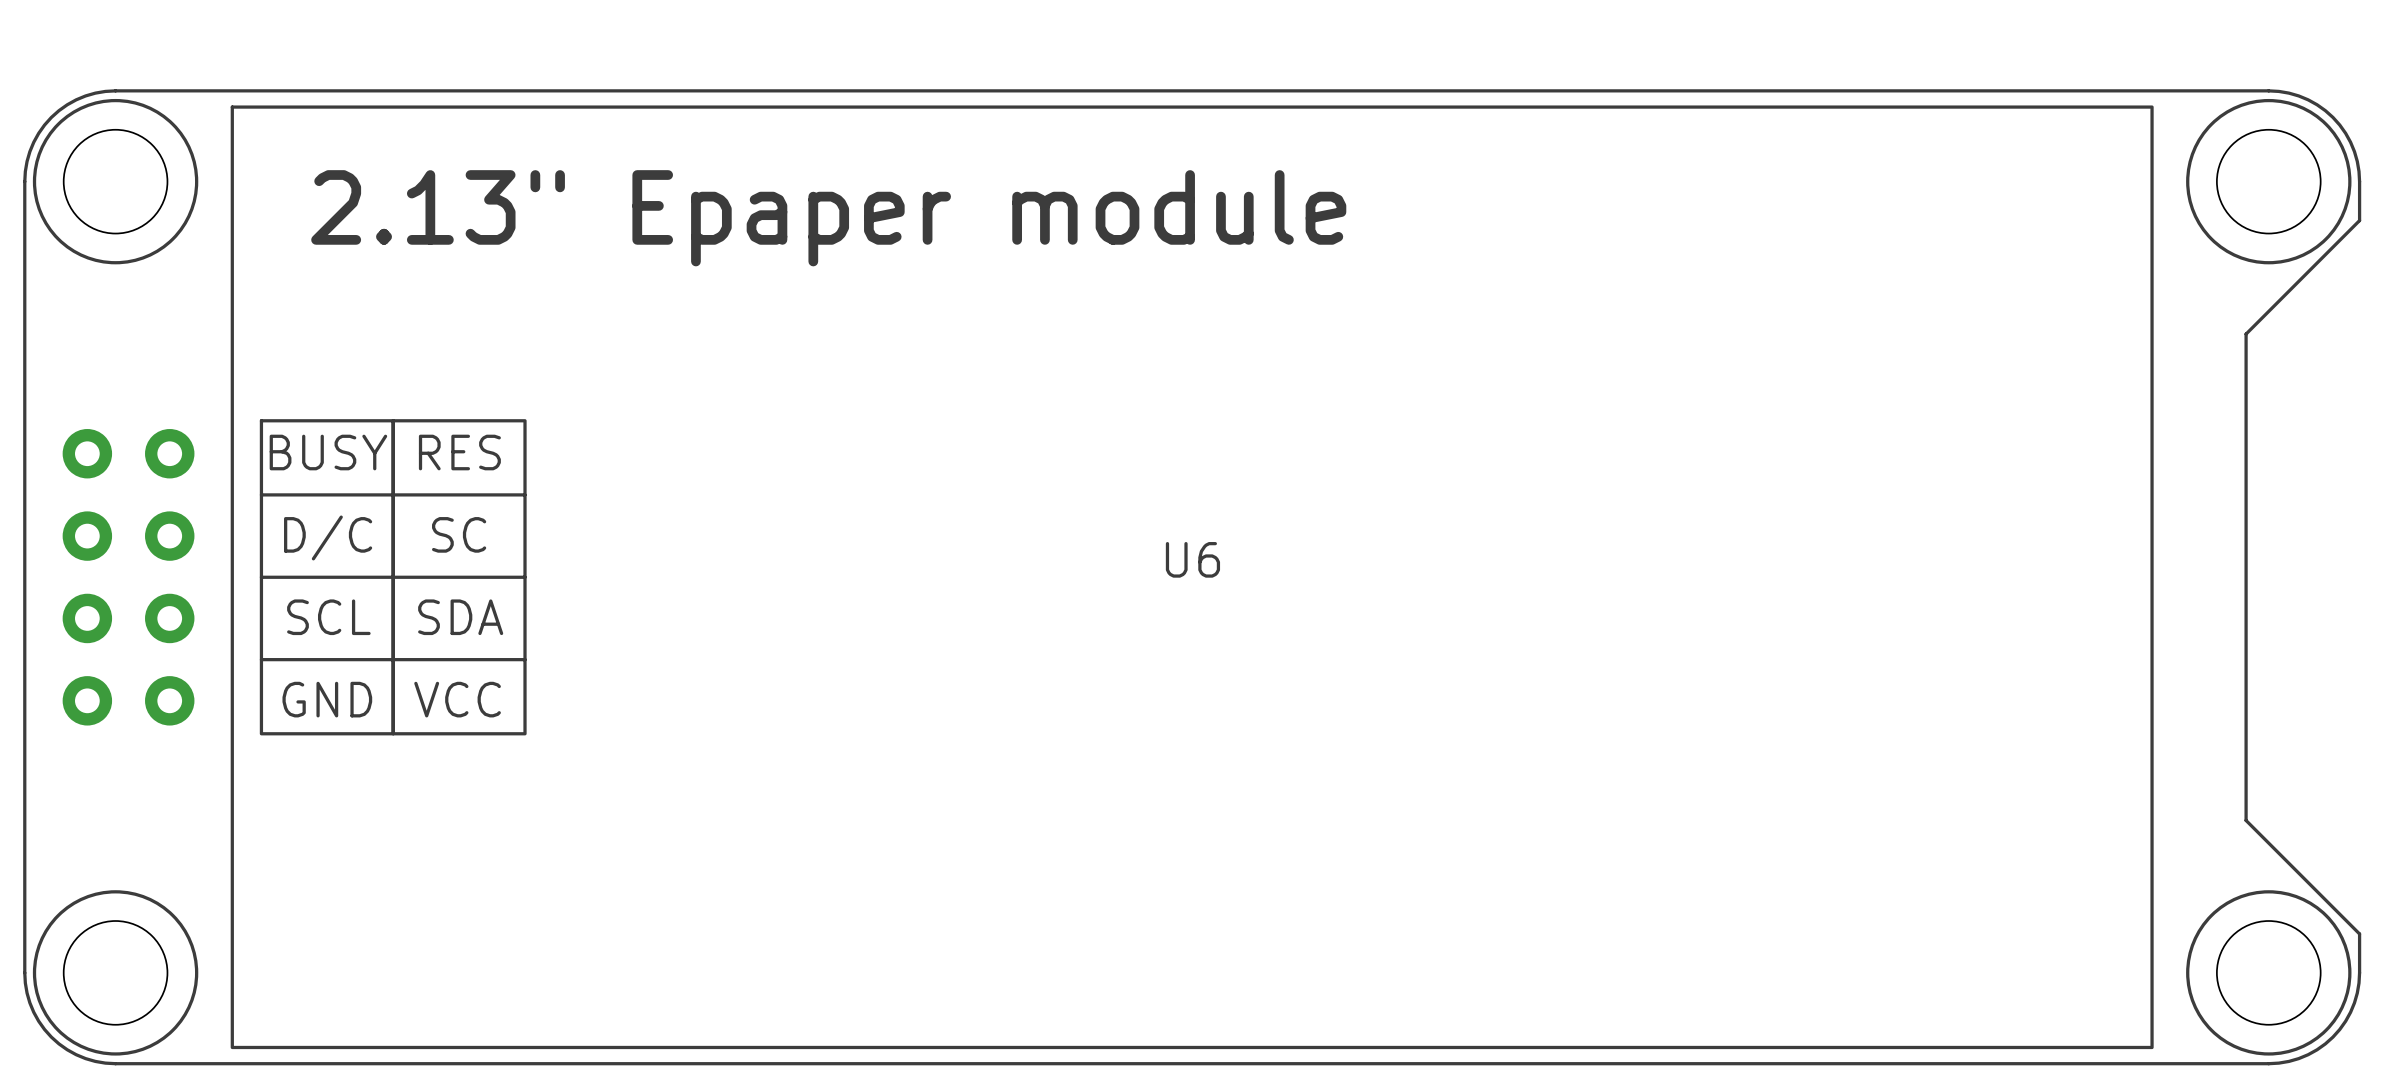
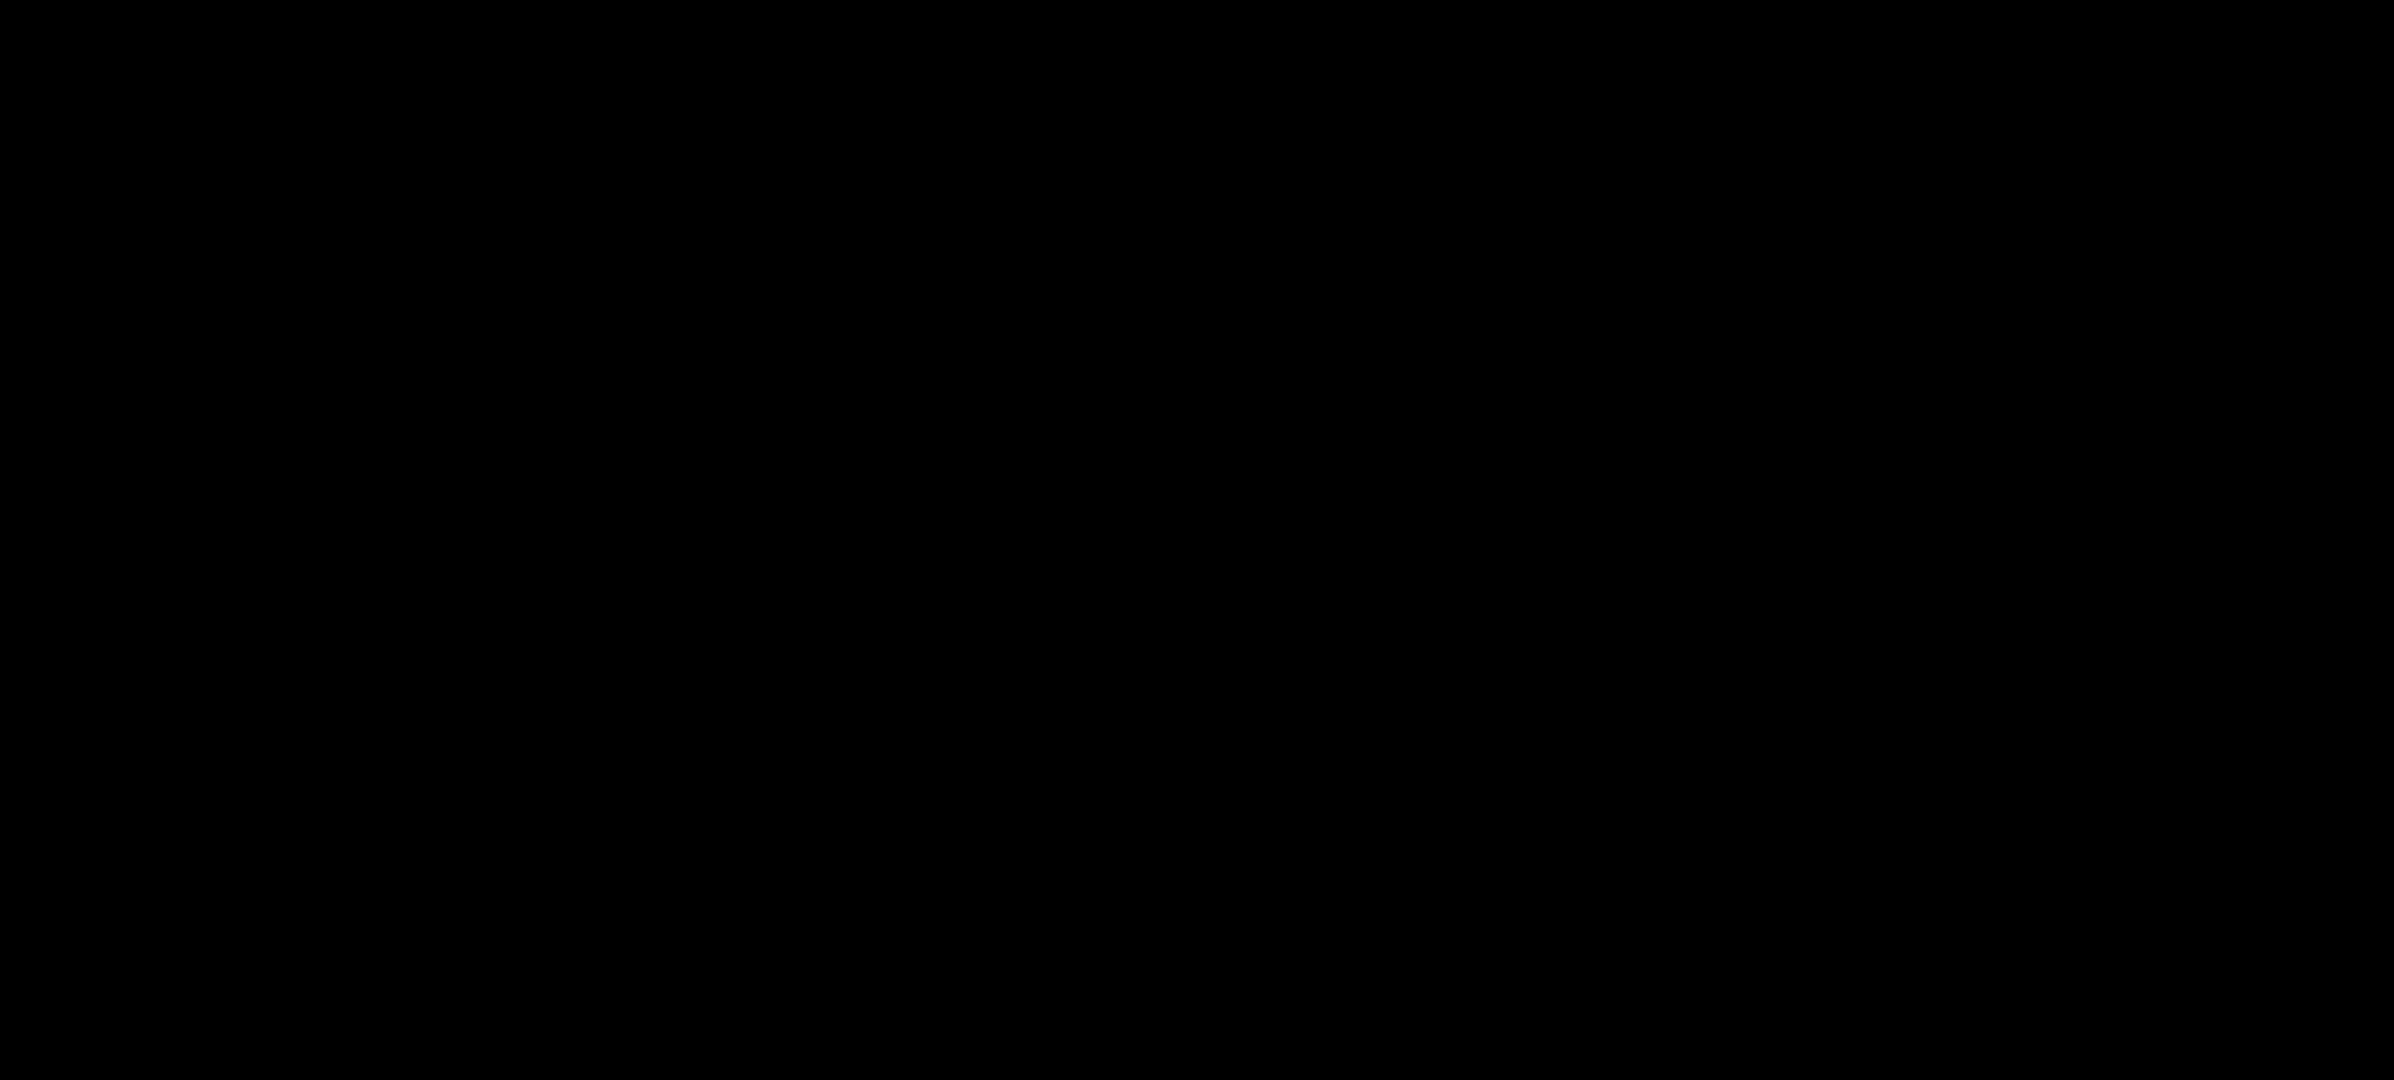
U6: (1192, 577) -> none

